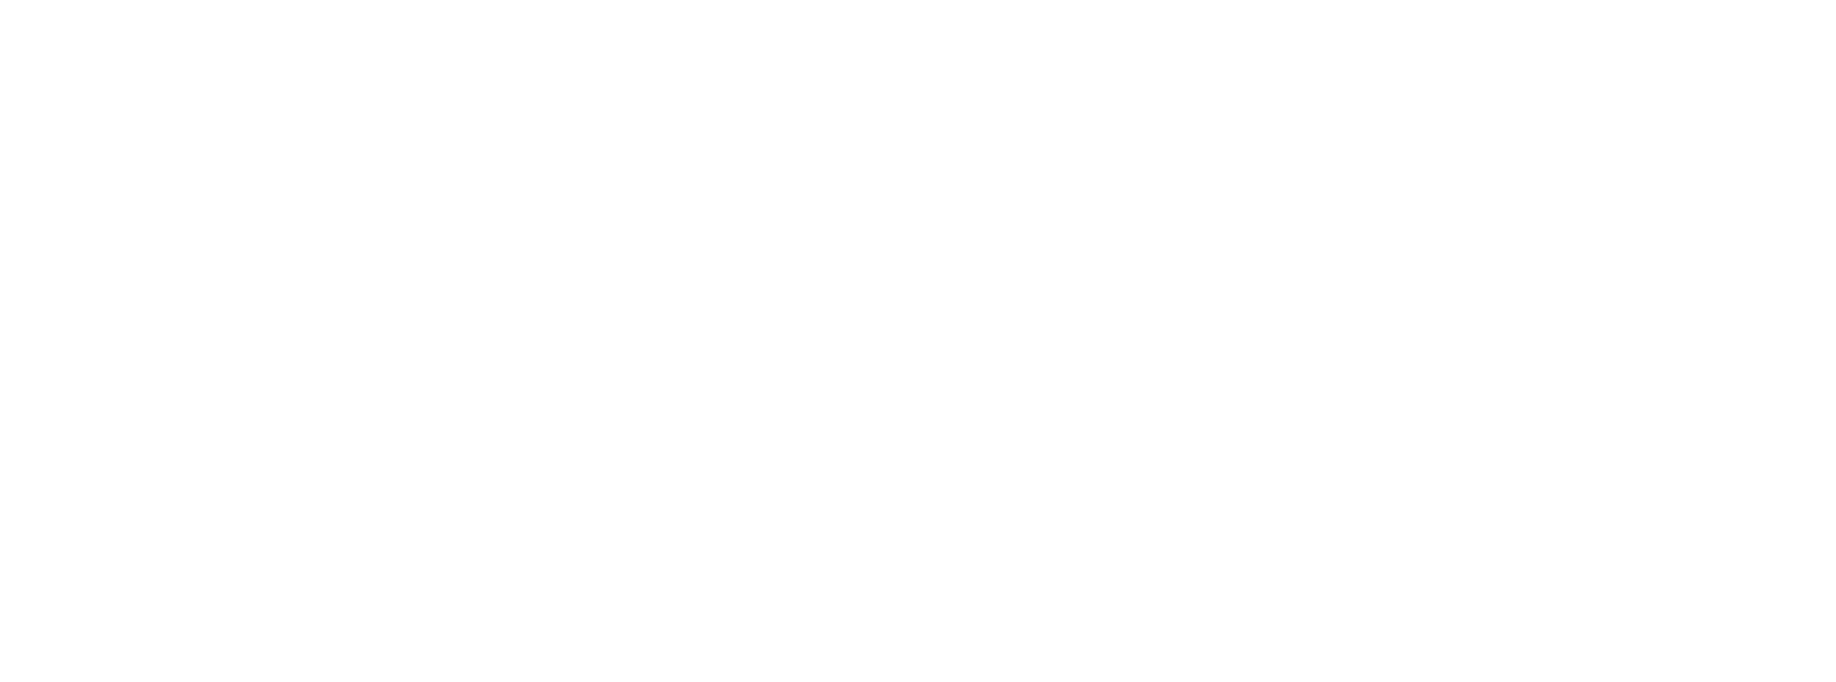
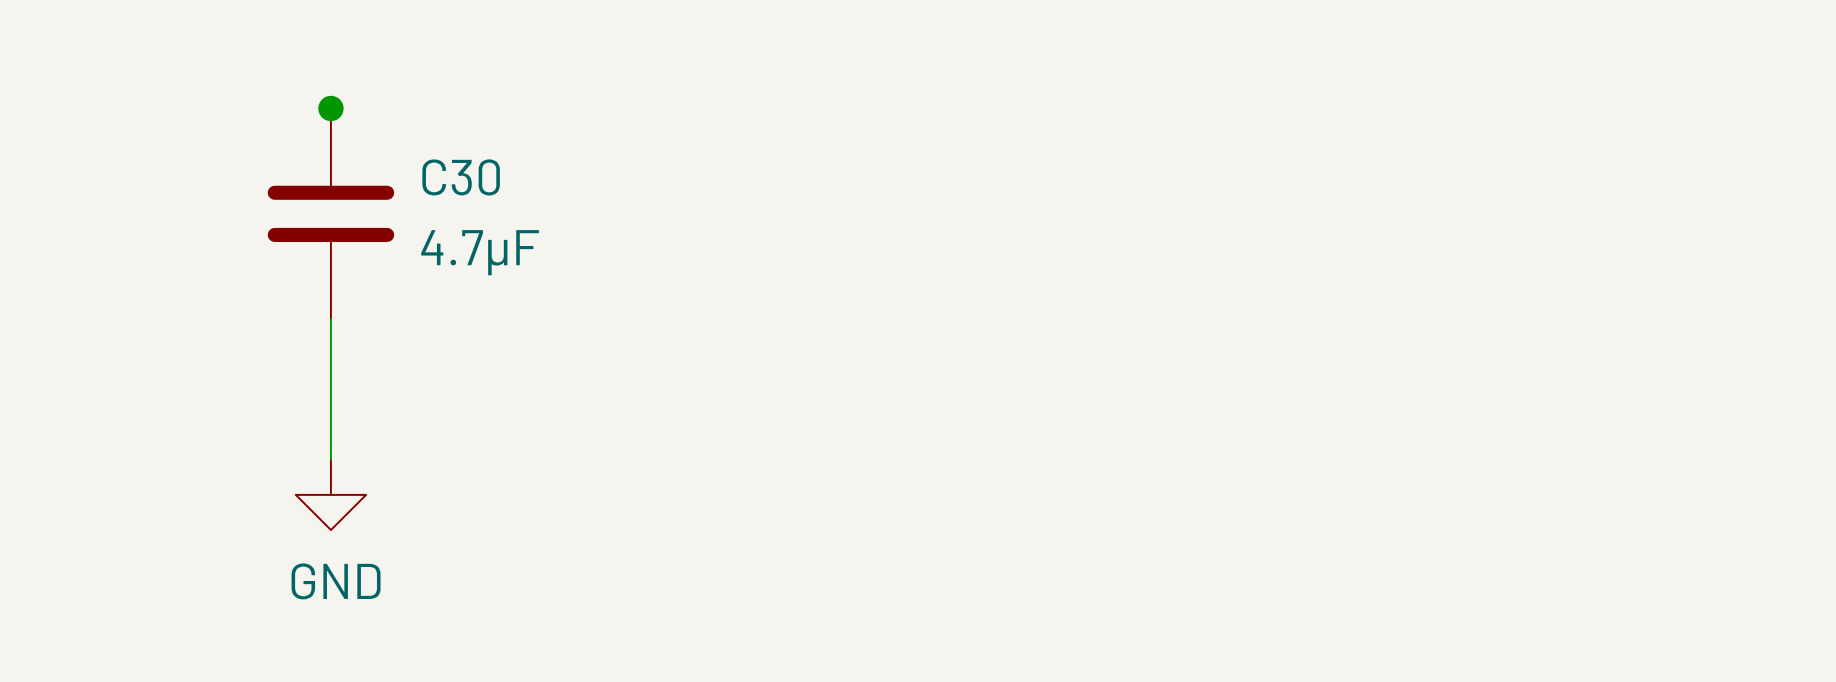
junction: none -> (330, 108)
C30: none -> 4.7µF (330, 213)
wire: none -> (330, 319) (330, 459)
power symbol: none -> GND (330, 494)

